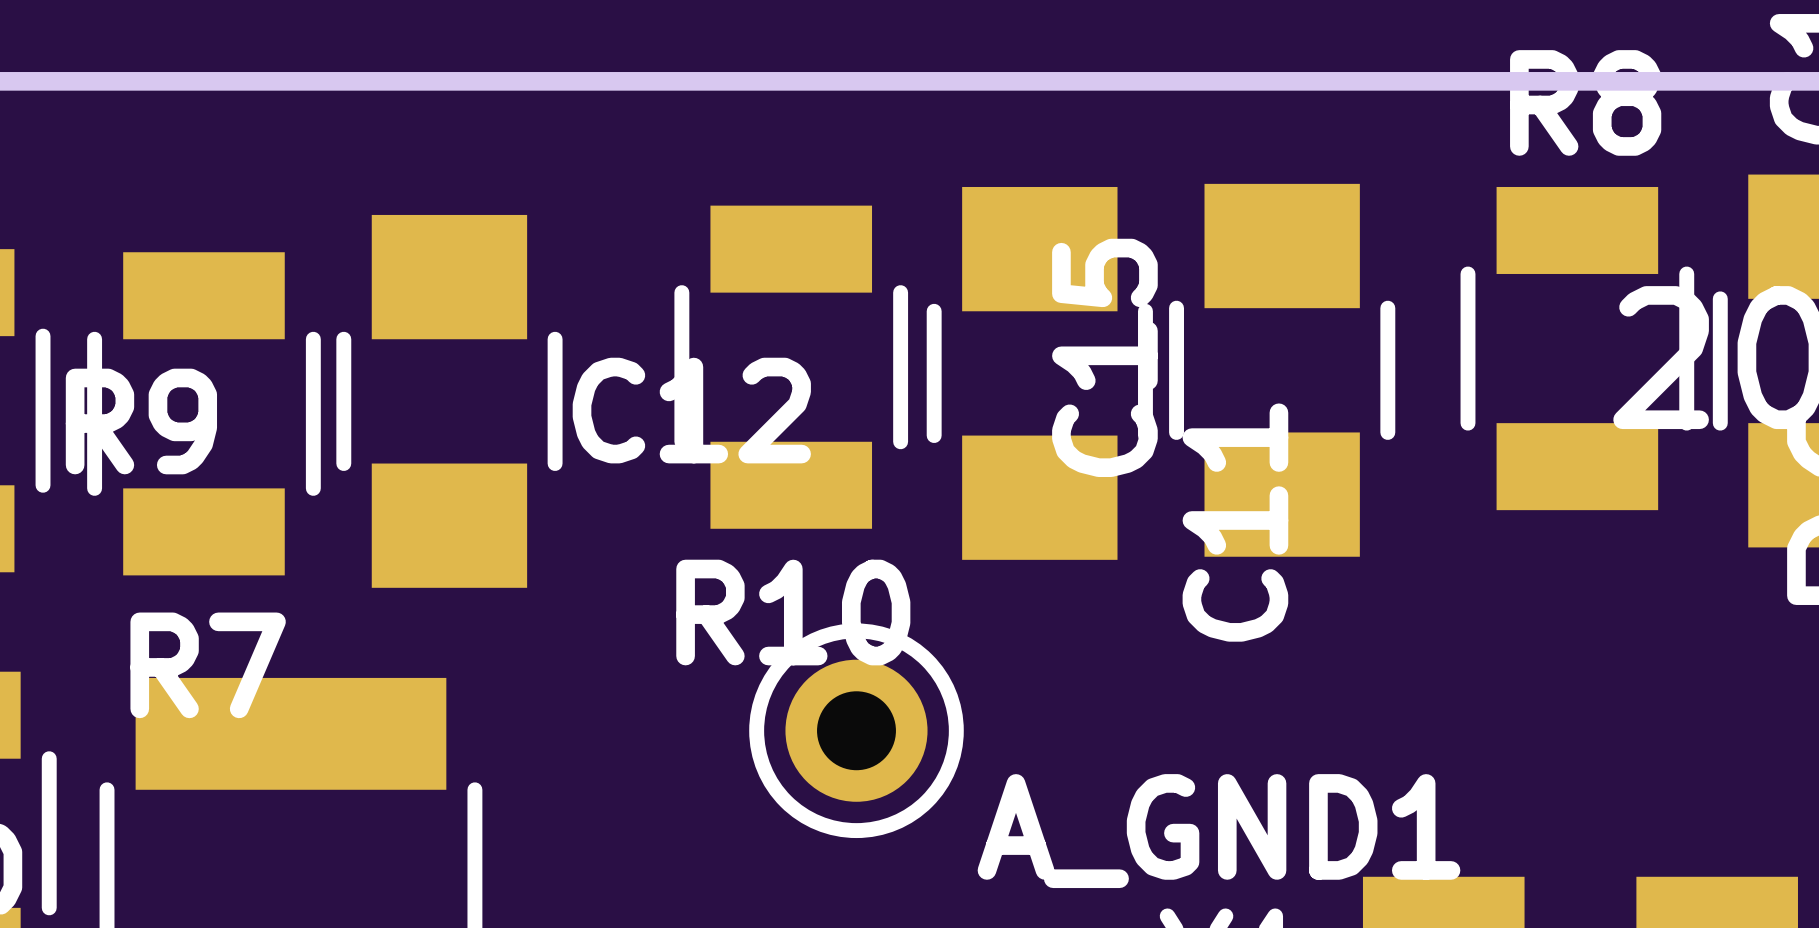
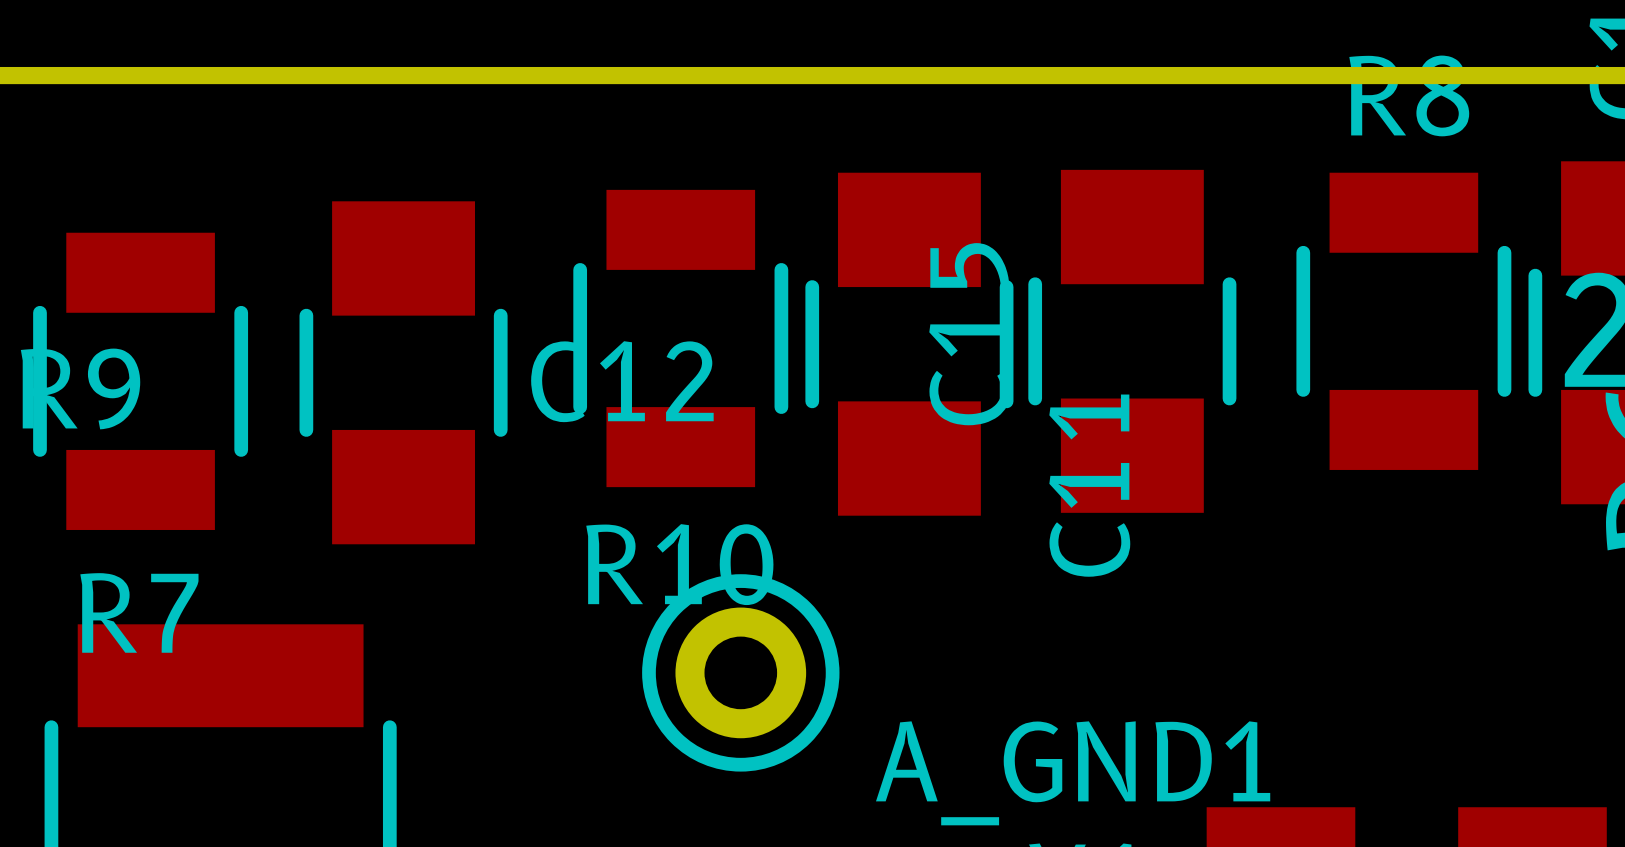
C12 position: (449, 401) -> (403, 372)

